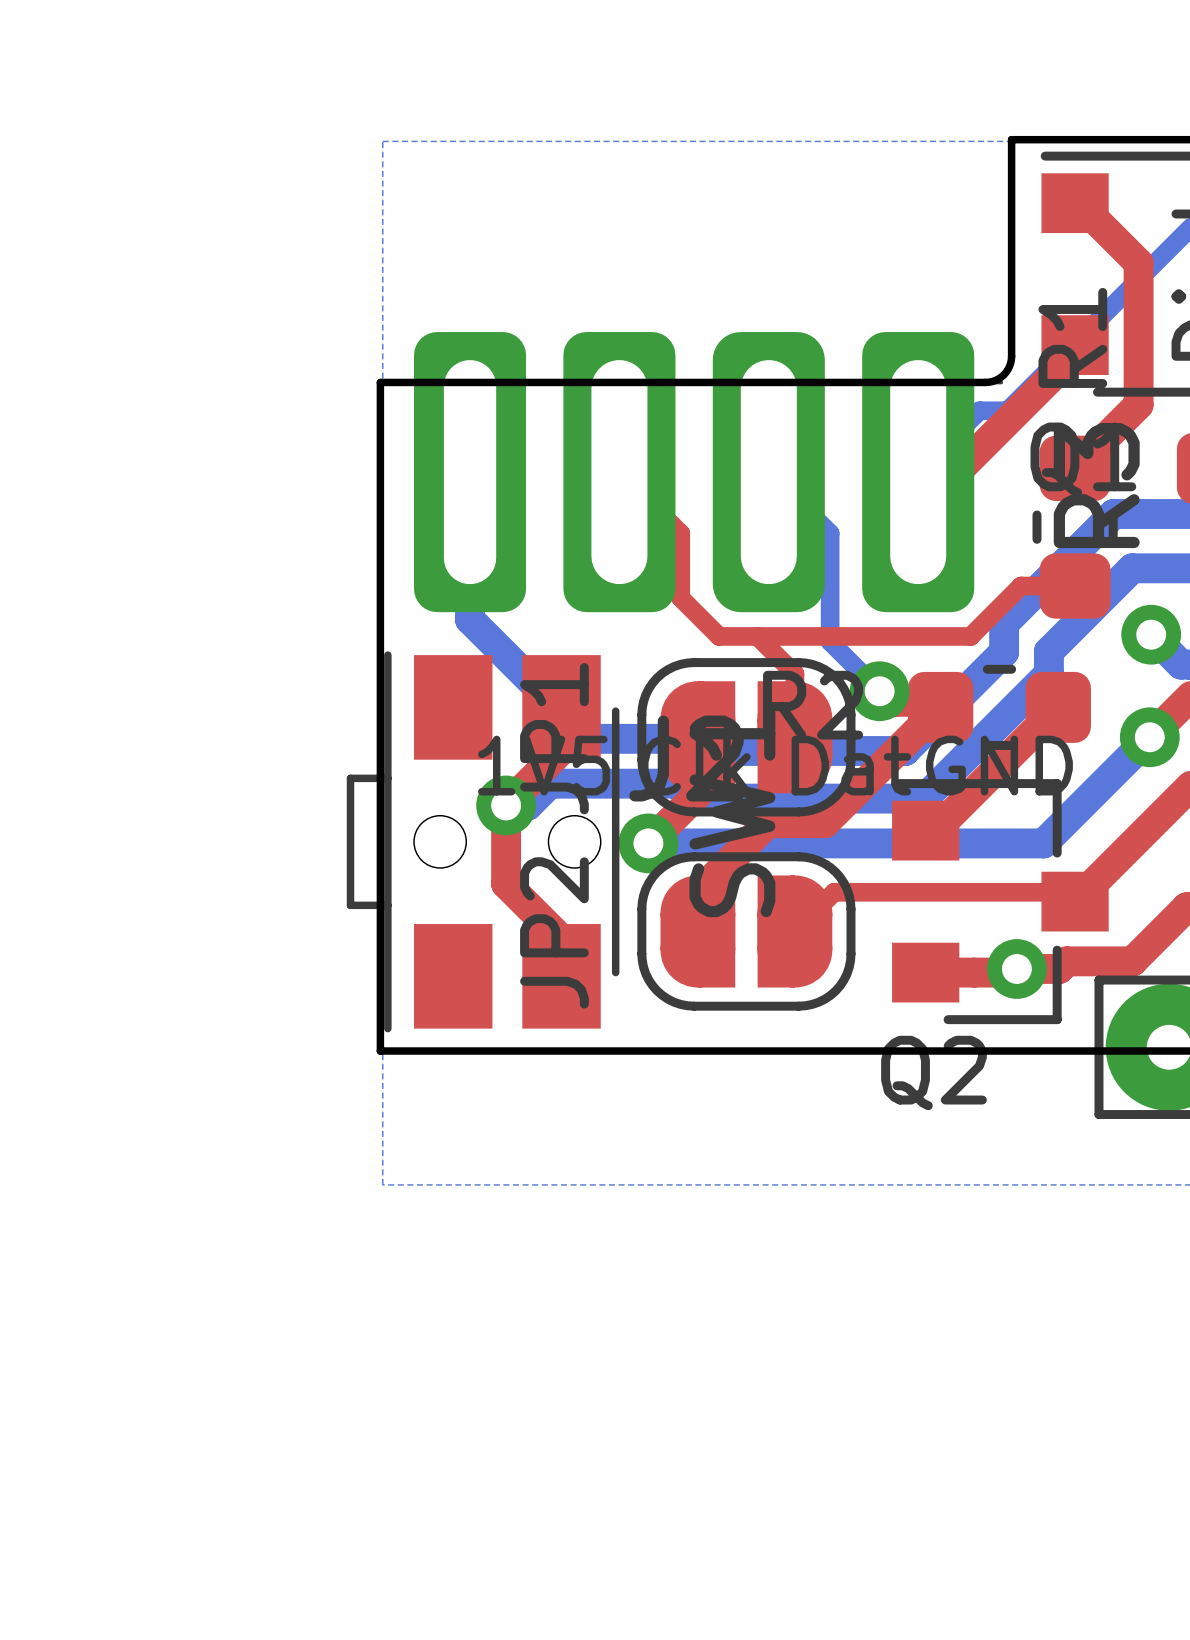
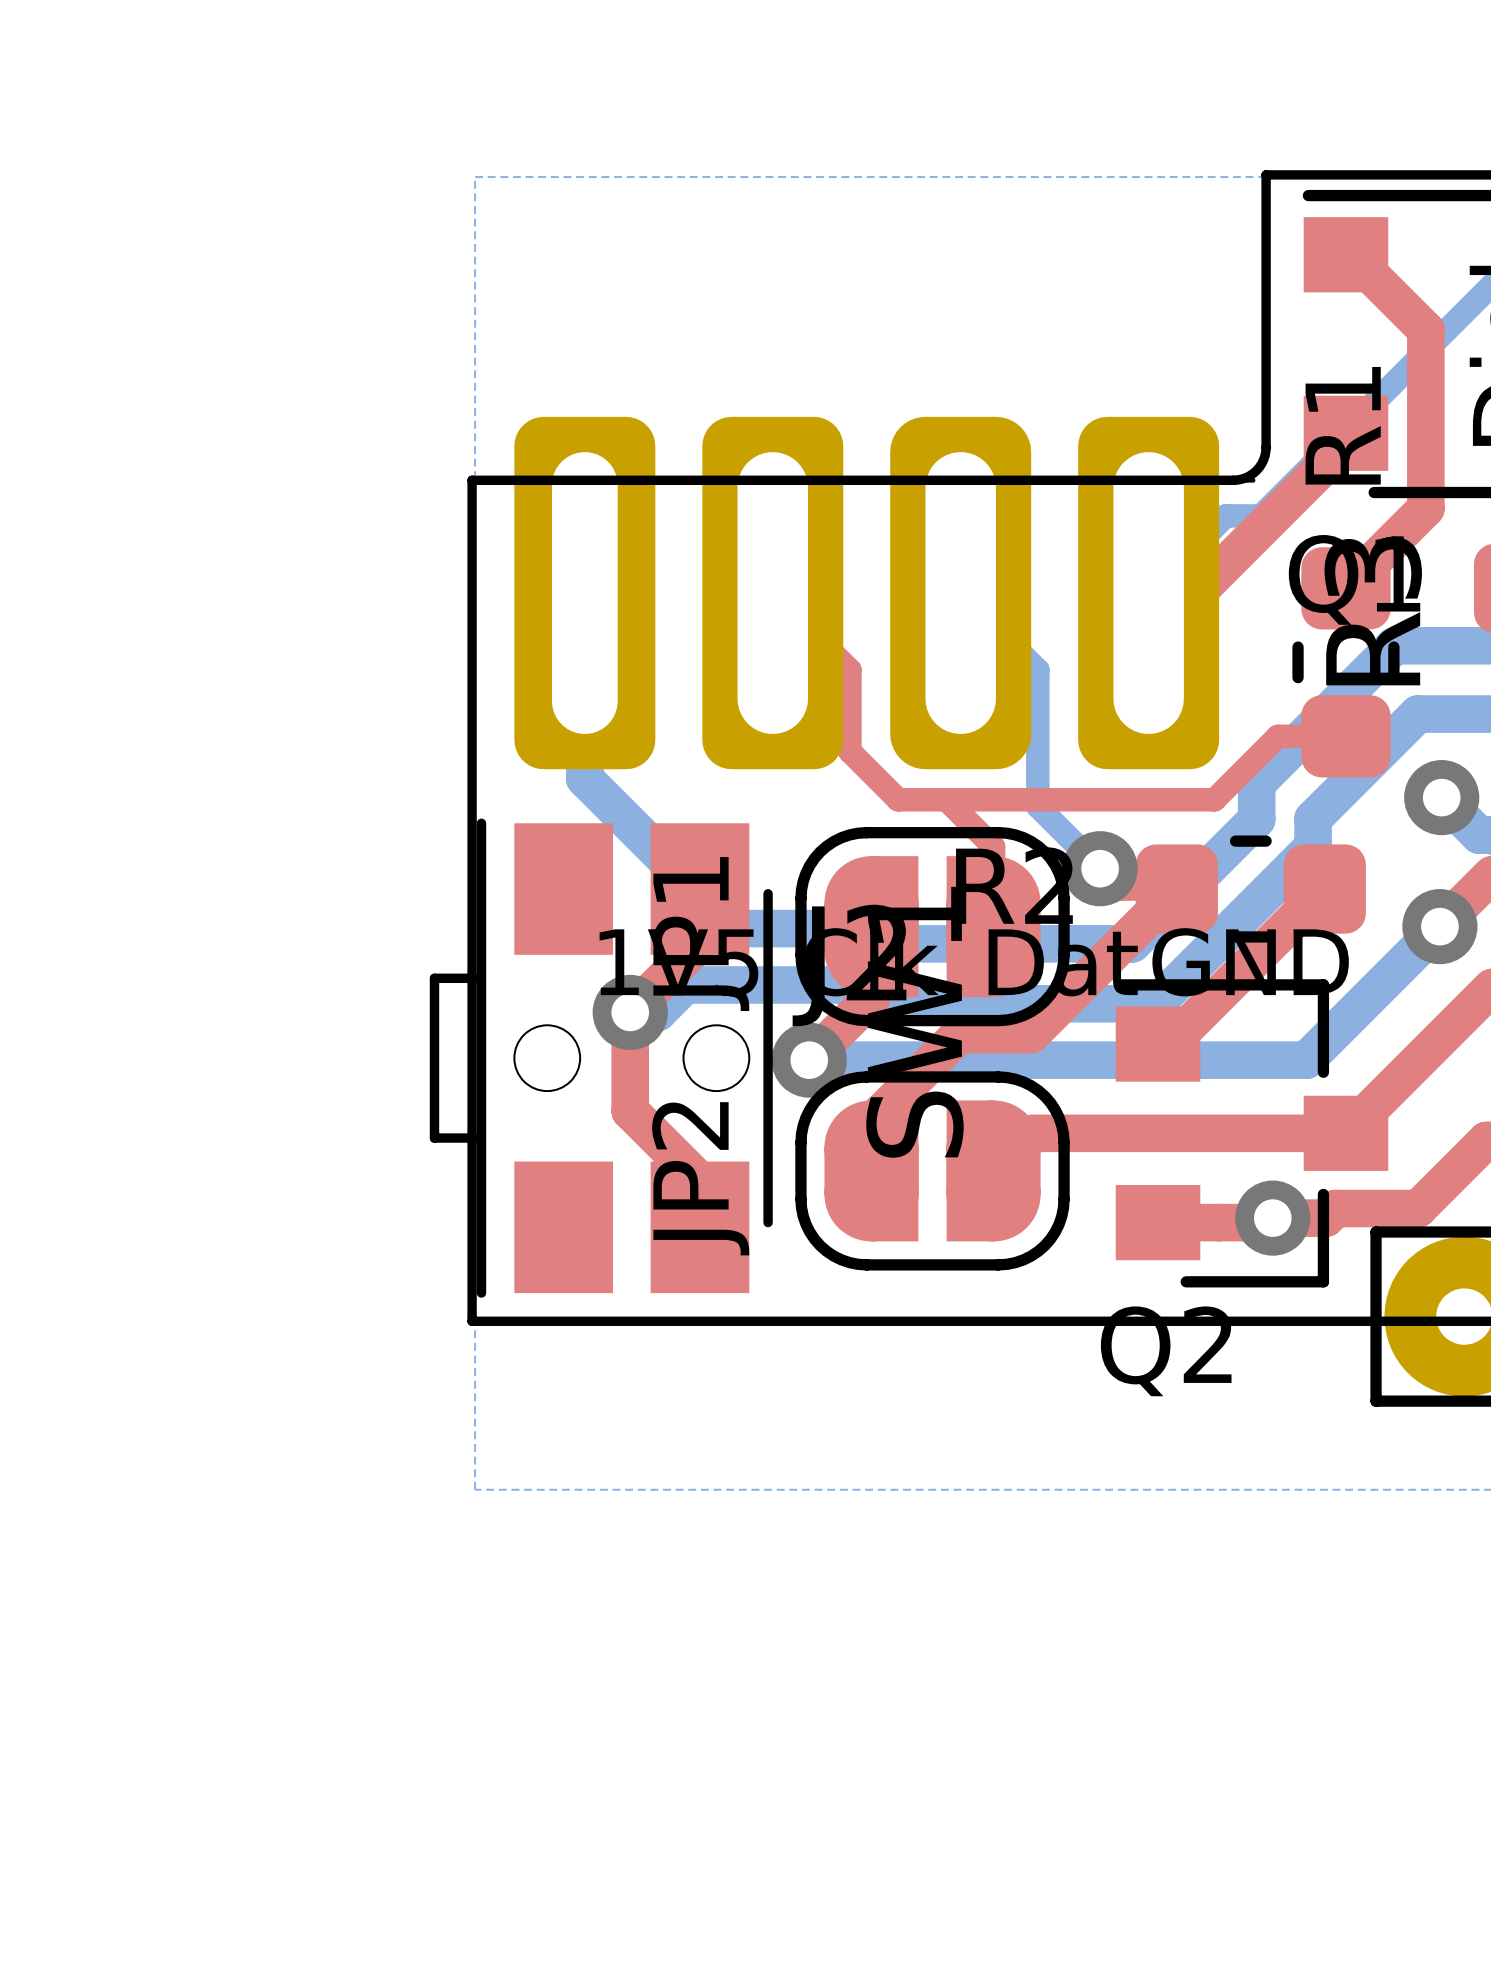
top track: (1062, 892) (834, 892) (824, 901) -> (1345, 1133) (1031, 1133)

